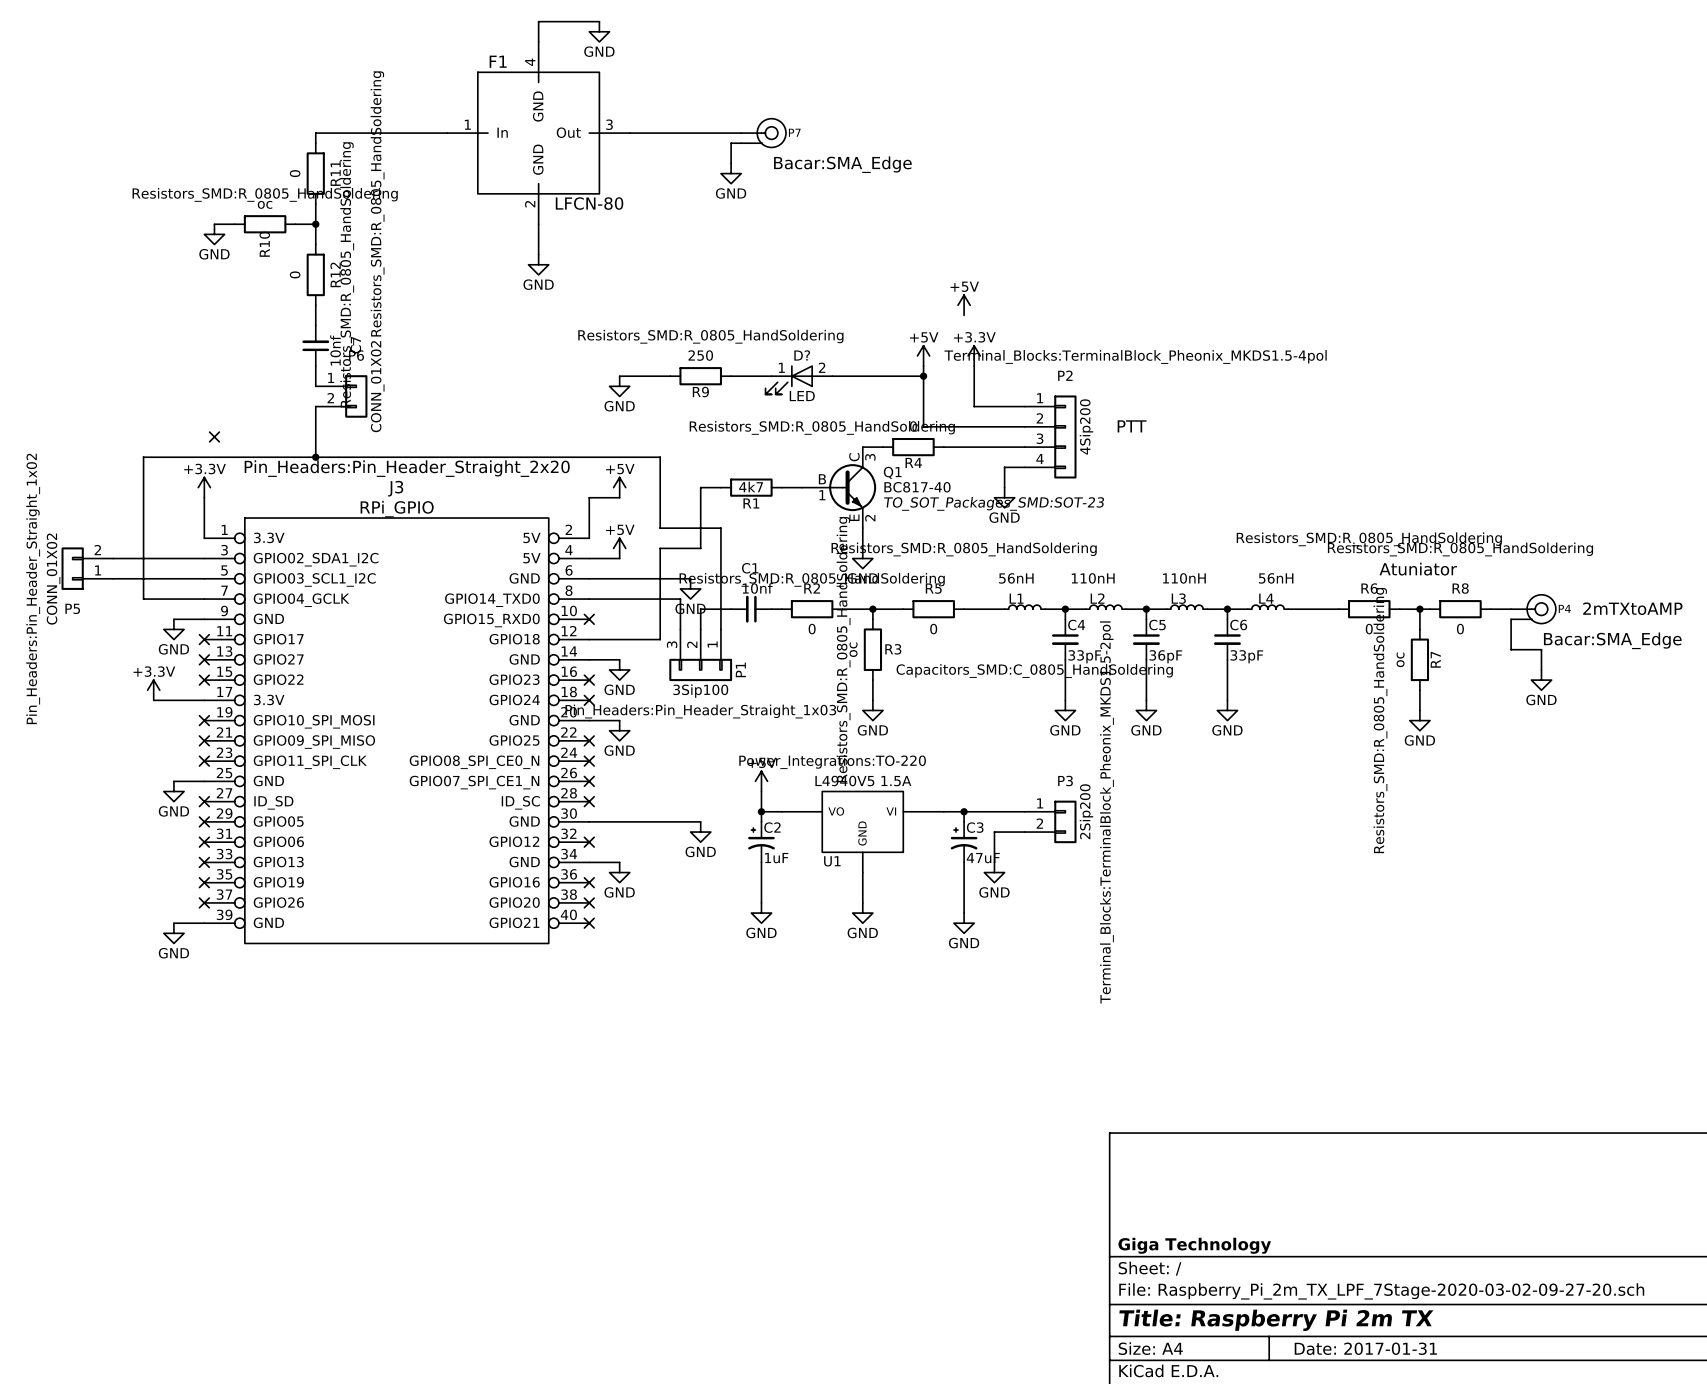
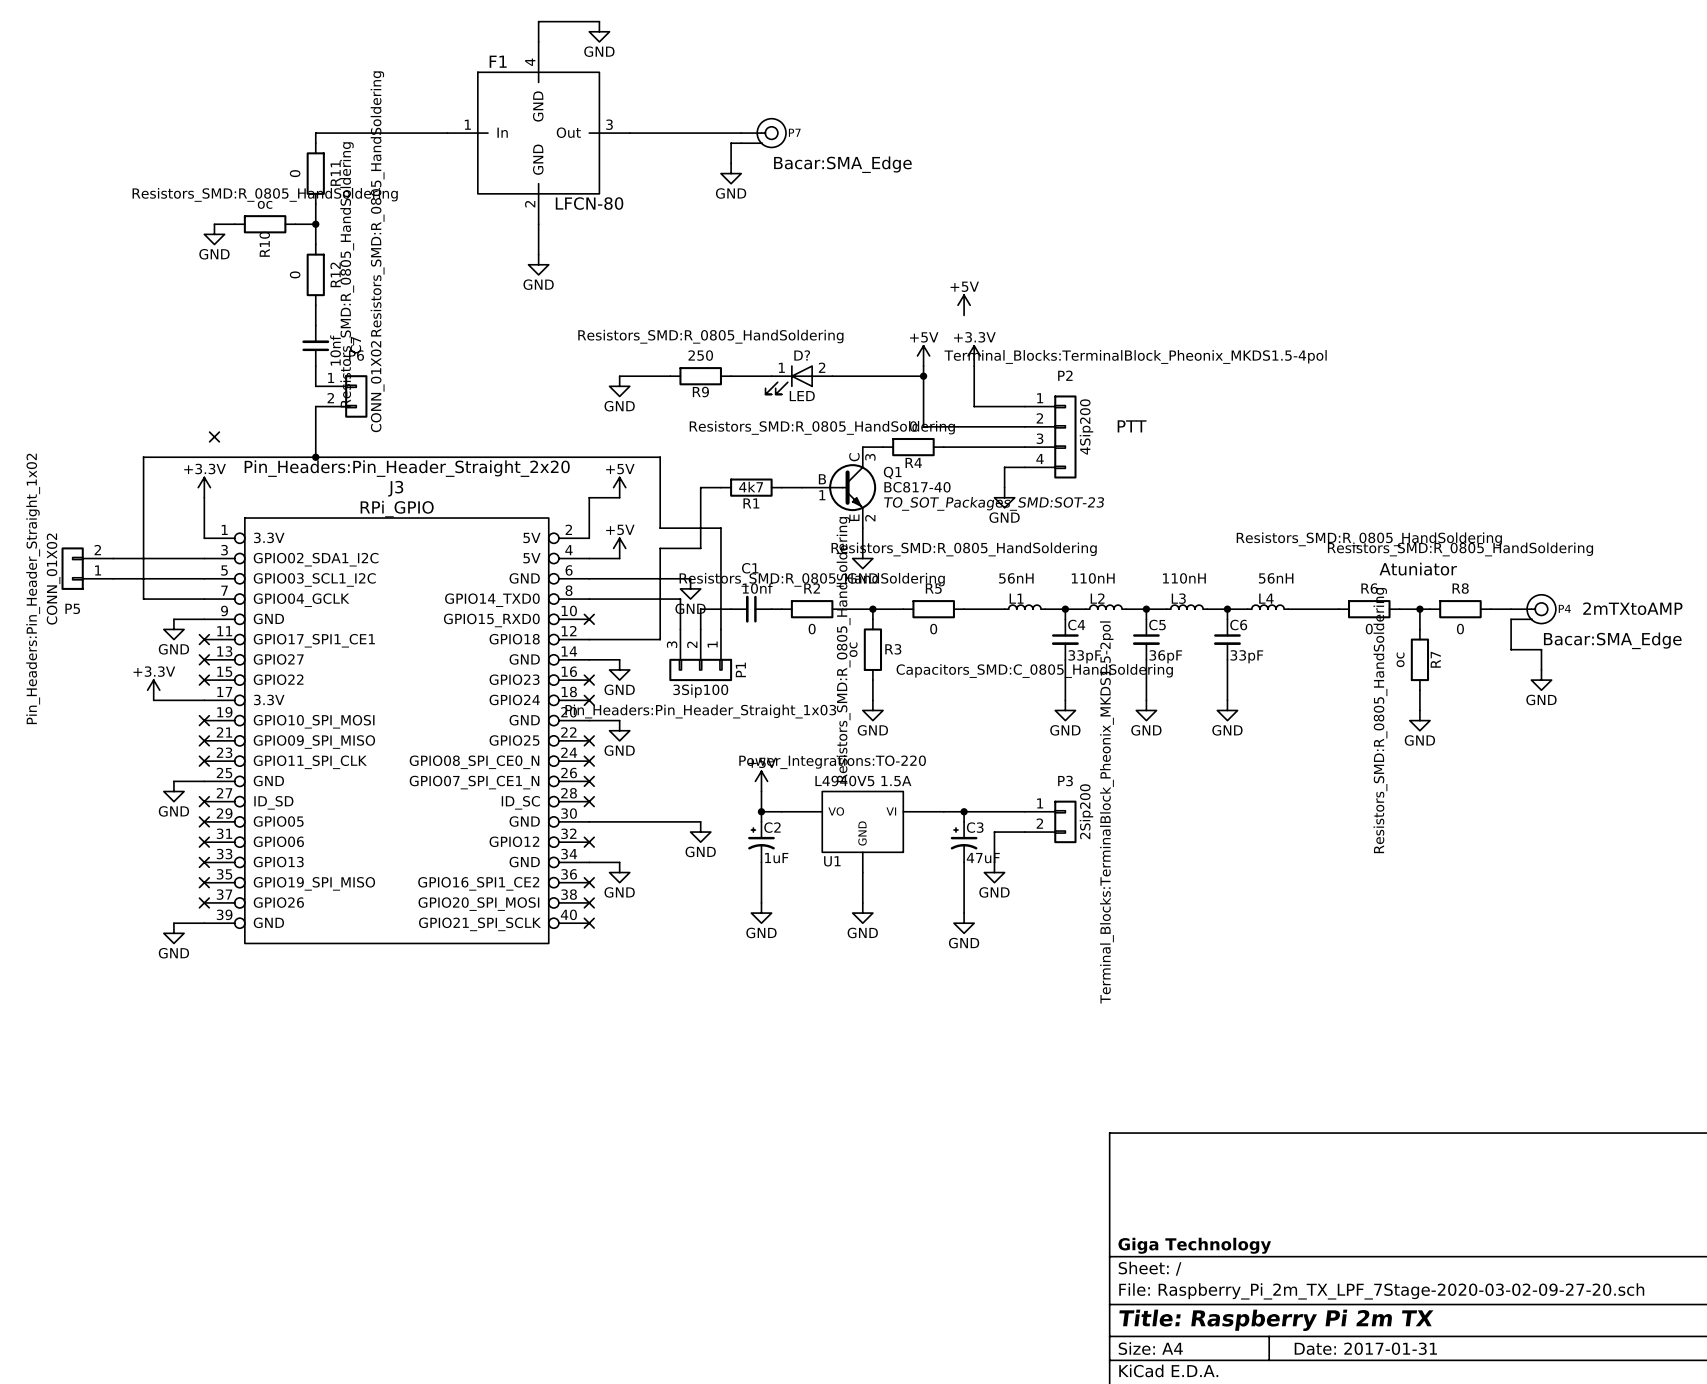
J3 pin name: GPIO17 (278, 639) -> GPIO17_SPI1_CE1 (314, 640)
J3 pin name: GPIO19 (278, 882) -> GPIO19_SPI_MISO (314, 883)
J3 pin name: GPIO16 (514, 882) -> GPIO16_SPI1_CE2 (478, 883)
J3 pin name: GPIO20 (514, 902) -> GPIO20_SPI_MOSI (478, 904)
J3 pin name: GPIO21 (514, 922) -> GPIO21_SPI_SCLK (479, 924)

